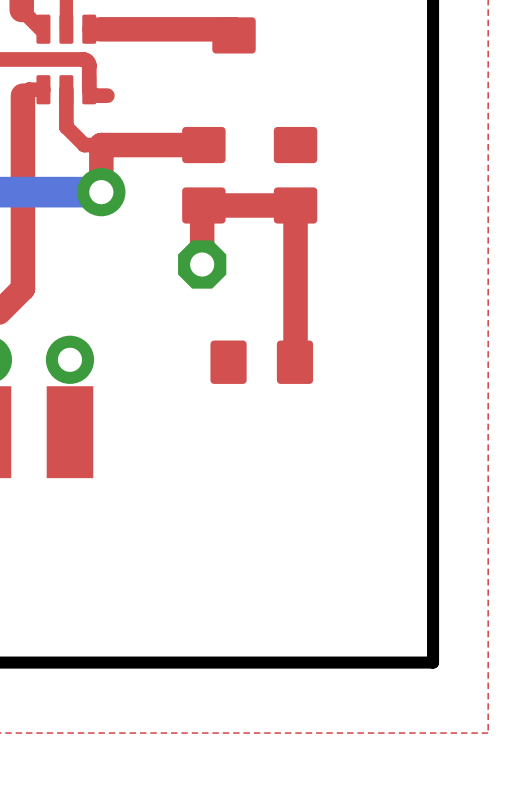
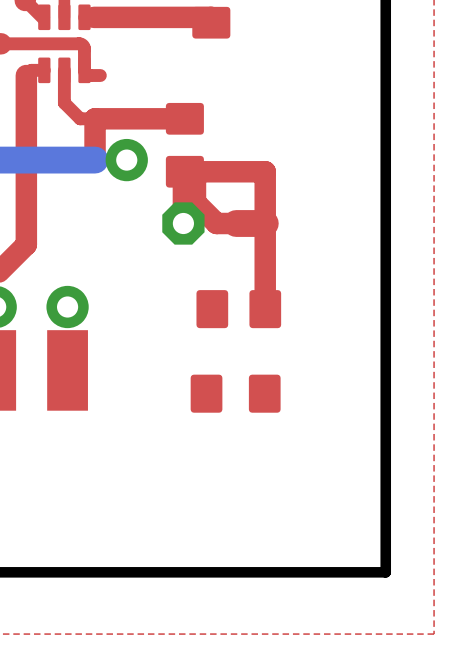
part: (295, 175) -> none
via position: (101, 192) -> (126, 160)
top track: none -> (195, 171) (195, 202) (216, 223) (265, 223)
part footprint: [210, 340, 314, 384] -> [196, 290, 282, 329]
part: none -> (235, 393)

